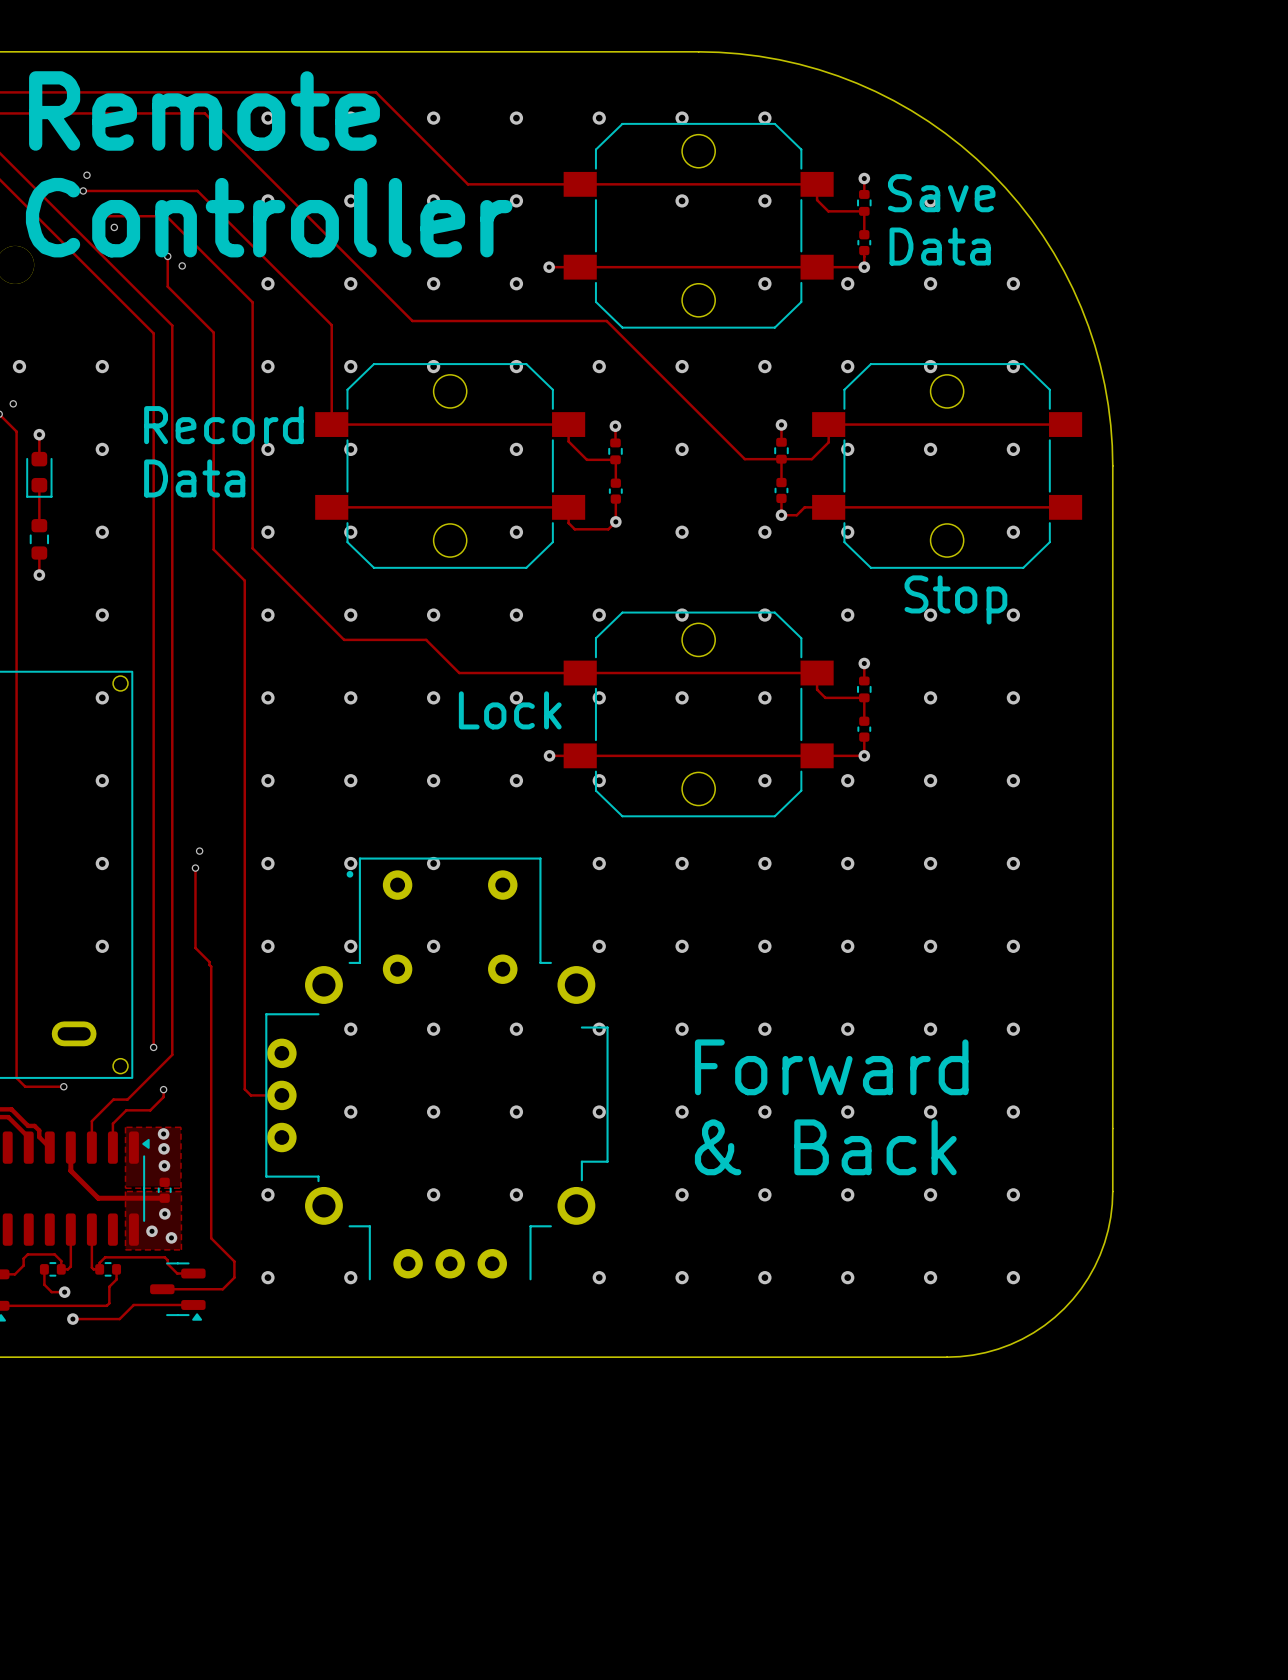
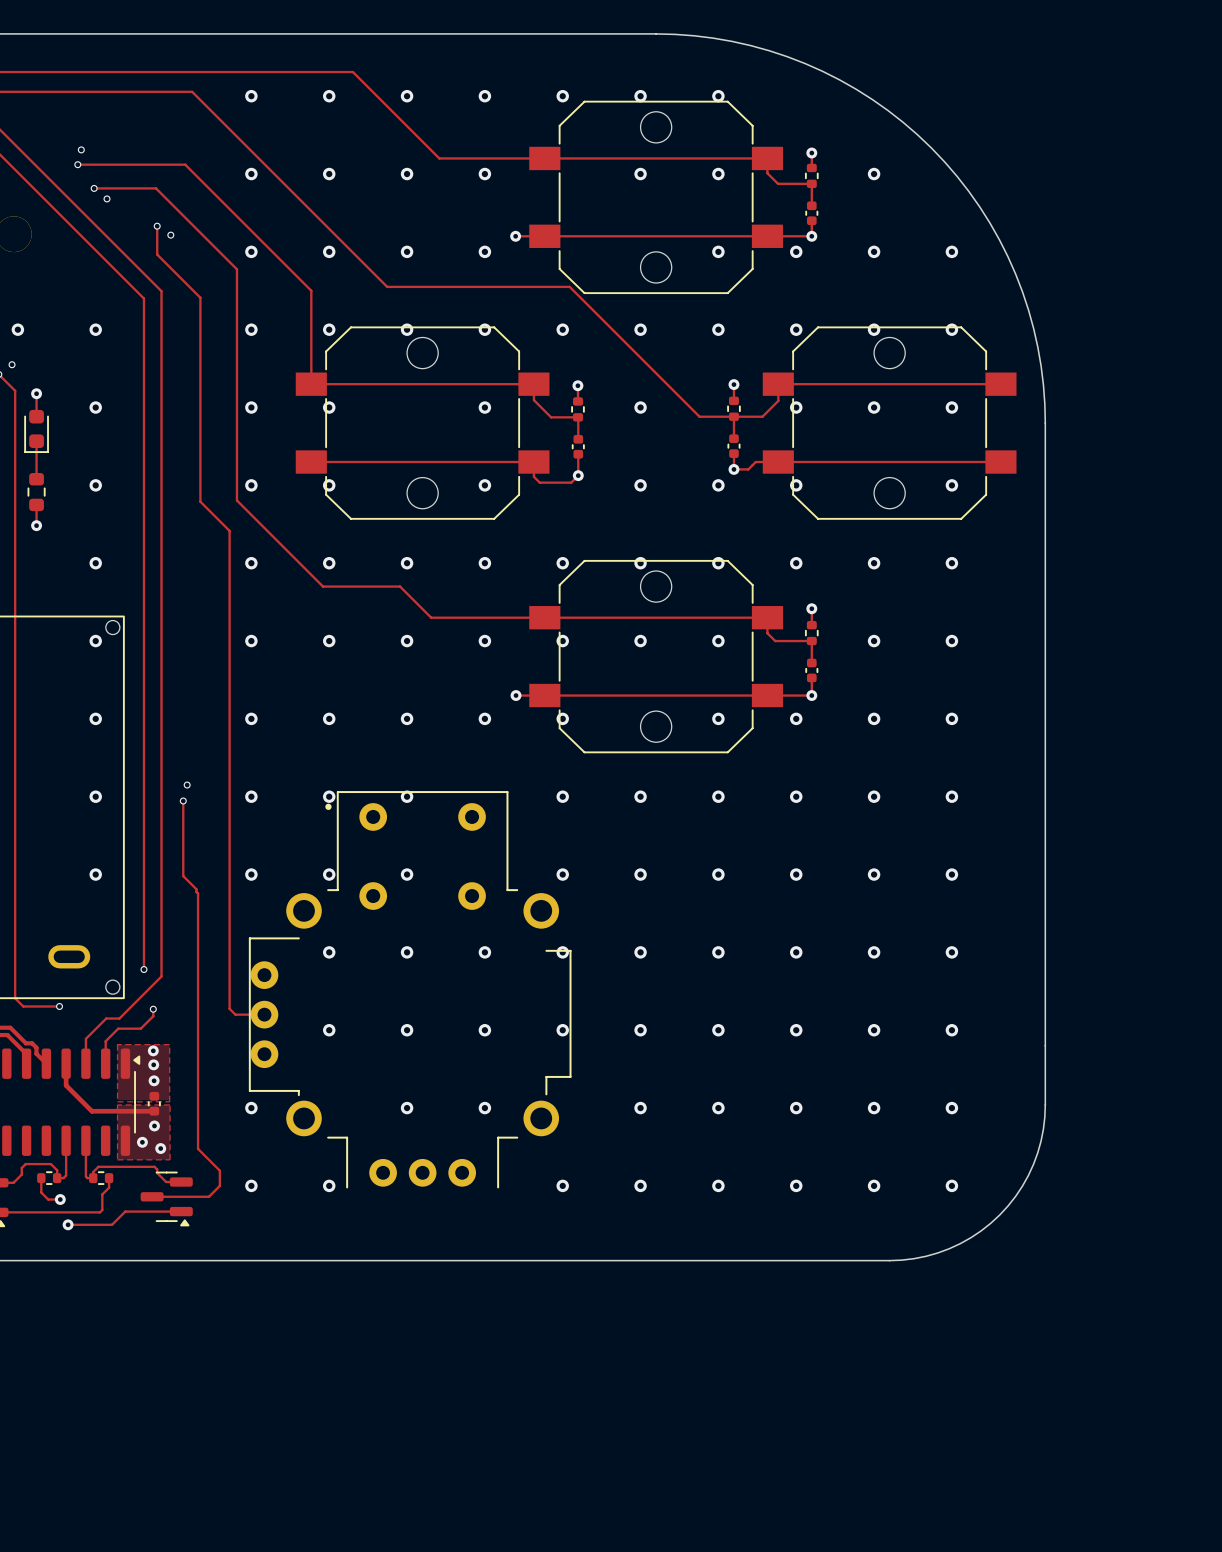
text: Remote (204, 110) -> none
text: Save (941, 193) -> none
text: Controller (269, 217) -> none
text: Data (940, 246) -> none
text: Record (223, 425) -> none
text: Data (194, 478) -> none
text: Stop (955, 599) -> none
text: Lock (510, 710) -> none
text: Forward (831, 1067) -> none
text: & Back (825, 1147) -> none

